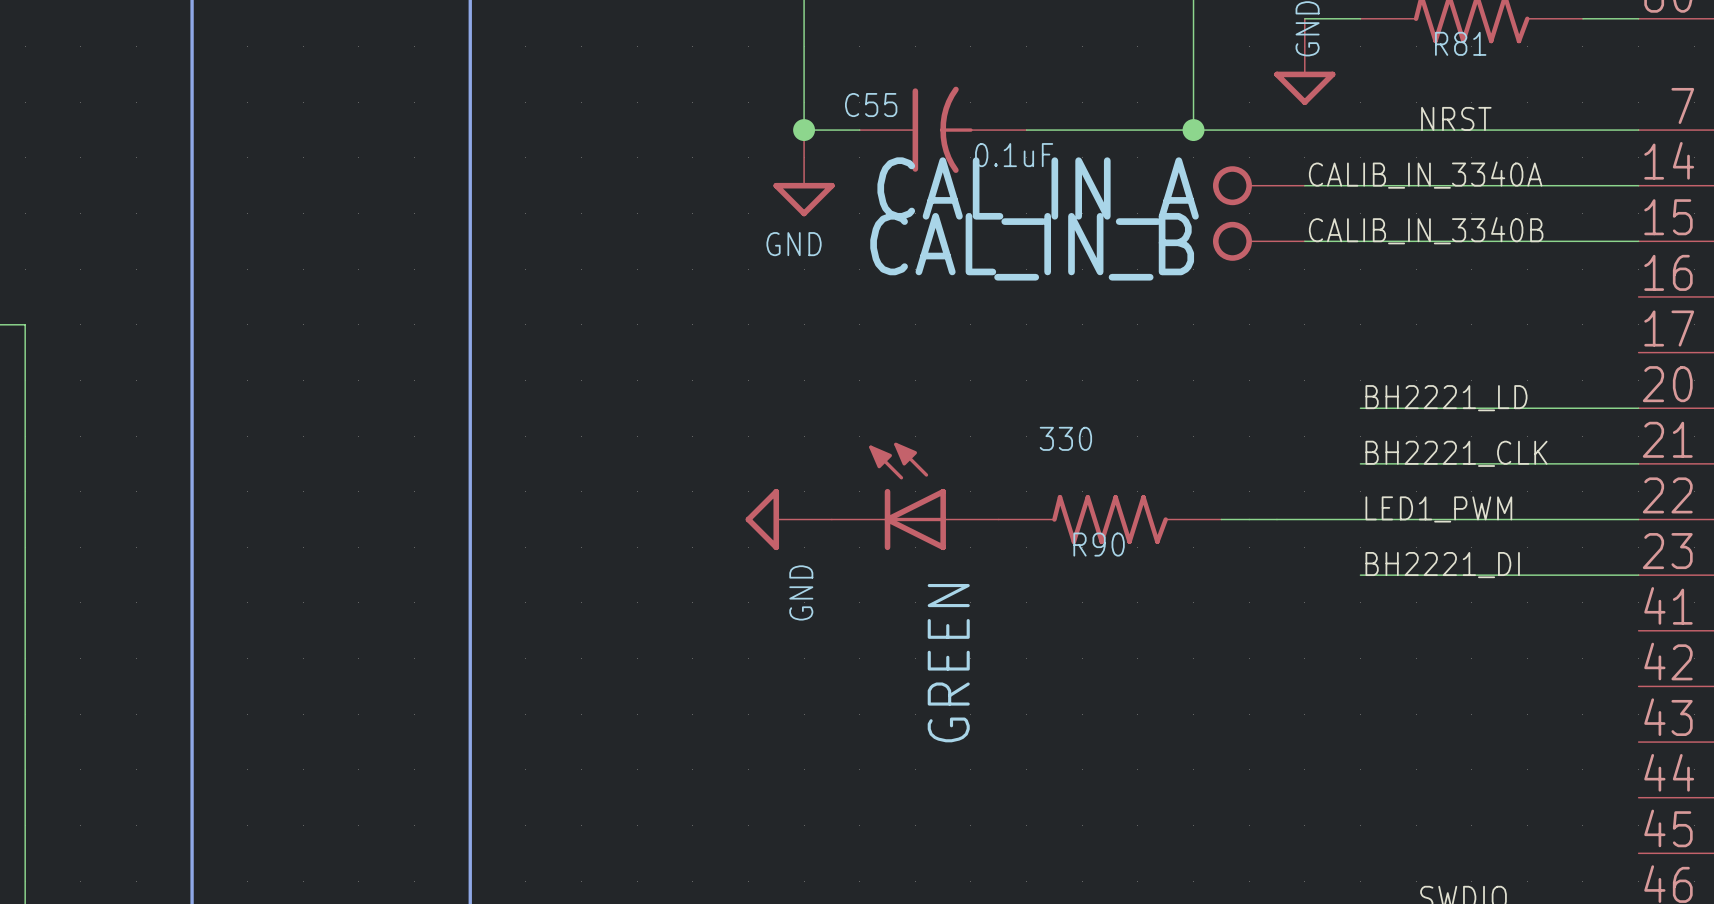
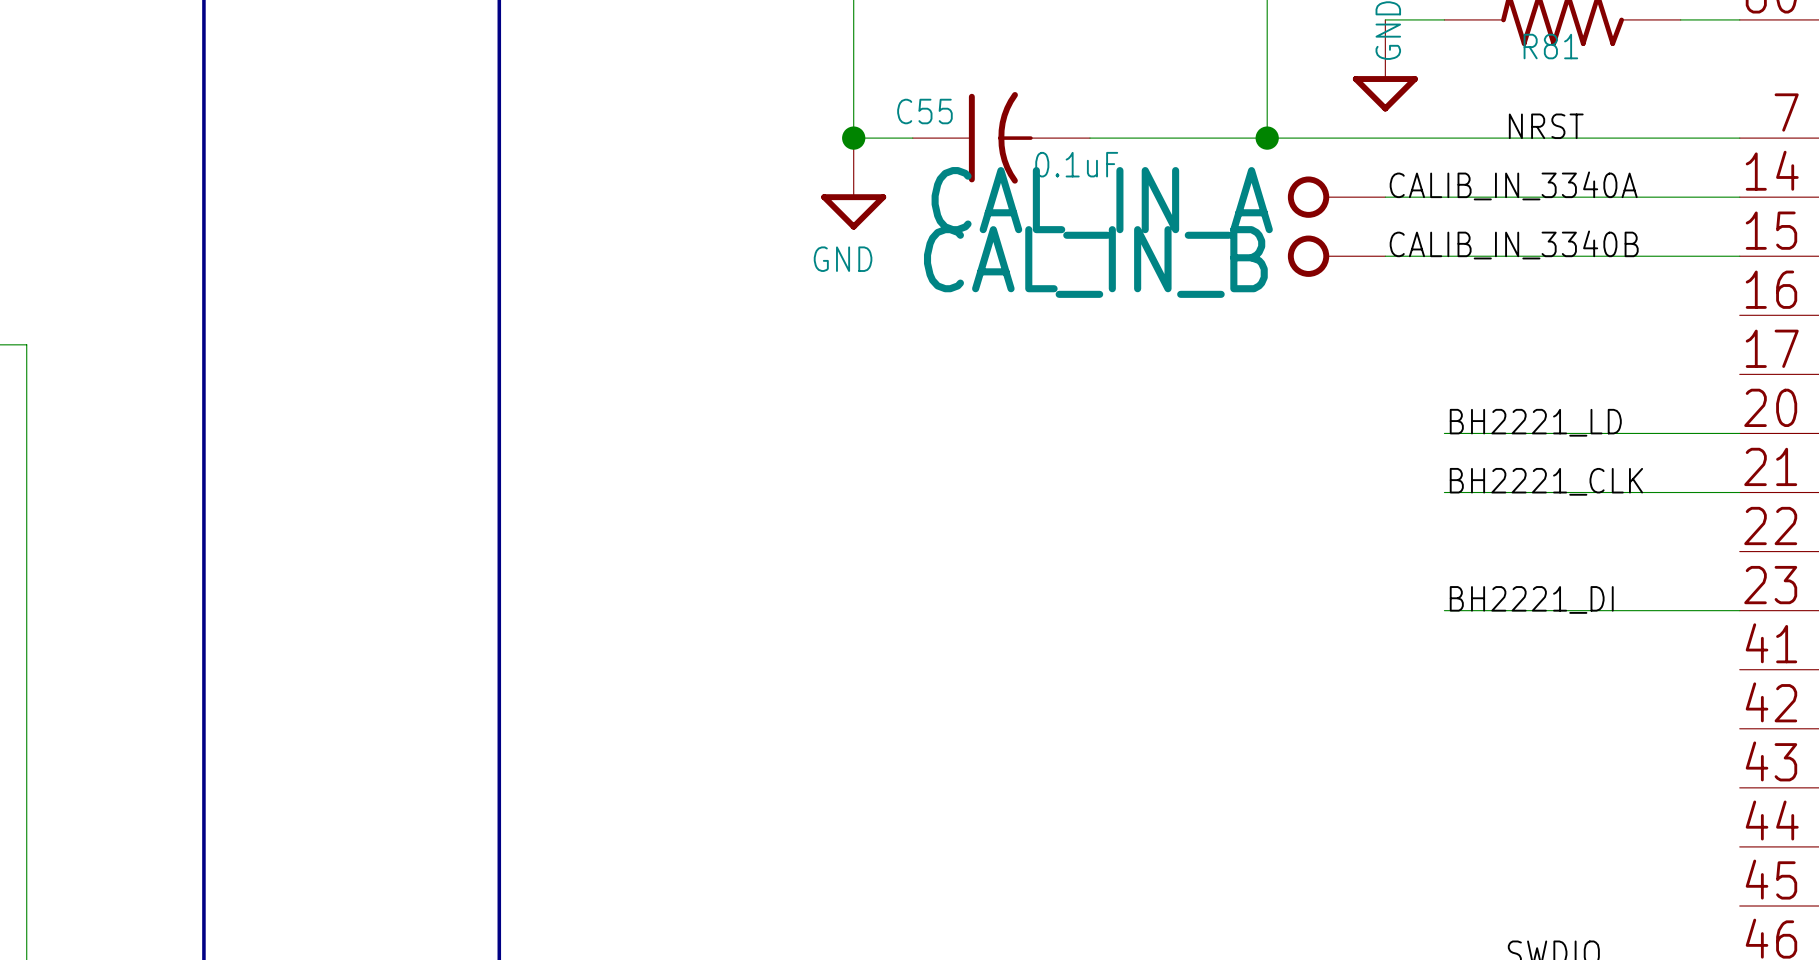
GREEN: (915, 496) -> none
label: LED1_PWM (1438, 509) -> none
power symbol: GND (788, 519) -> none
R90: 330 (1110, 519) -> none
wire: (1221, 519) (1638, 519) -> none

